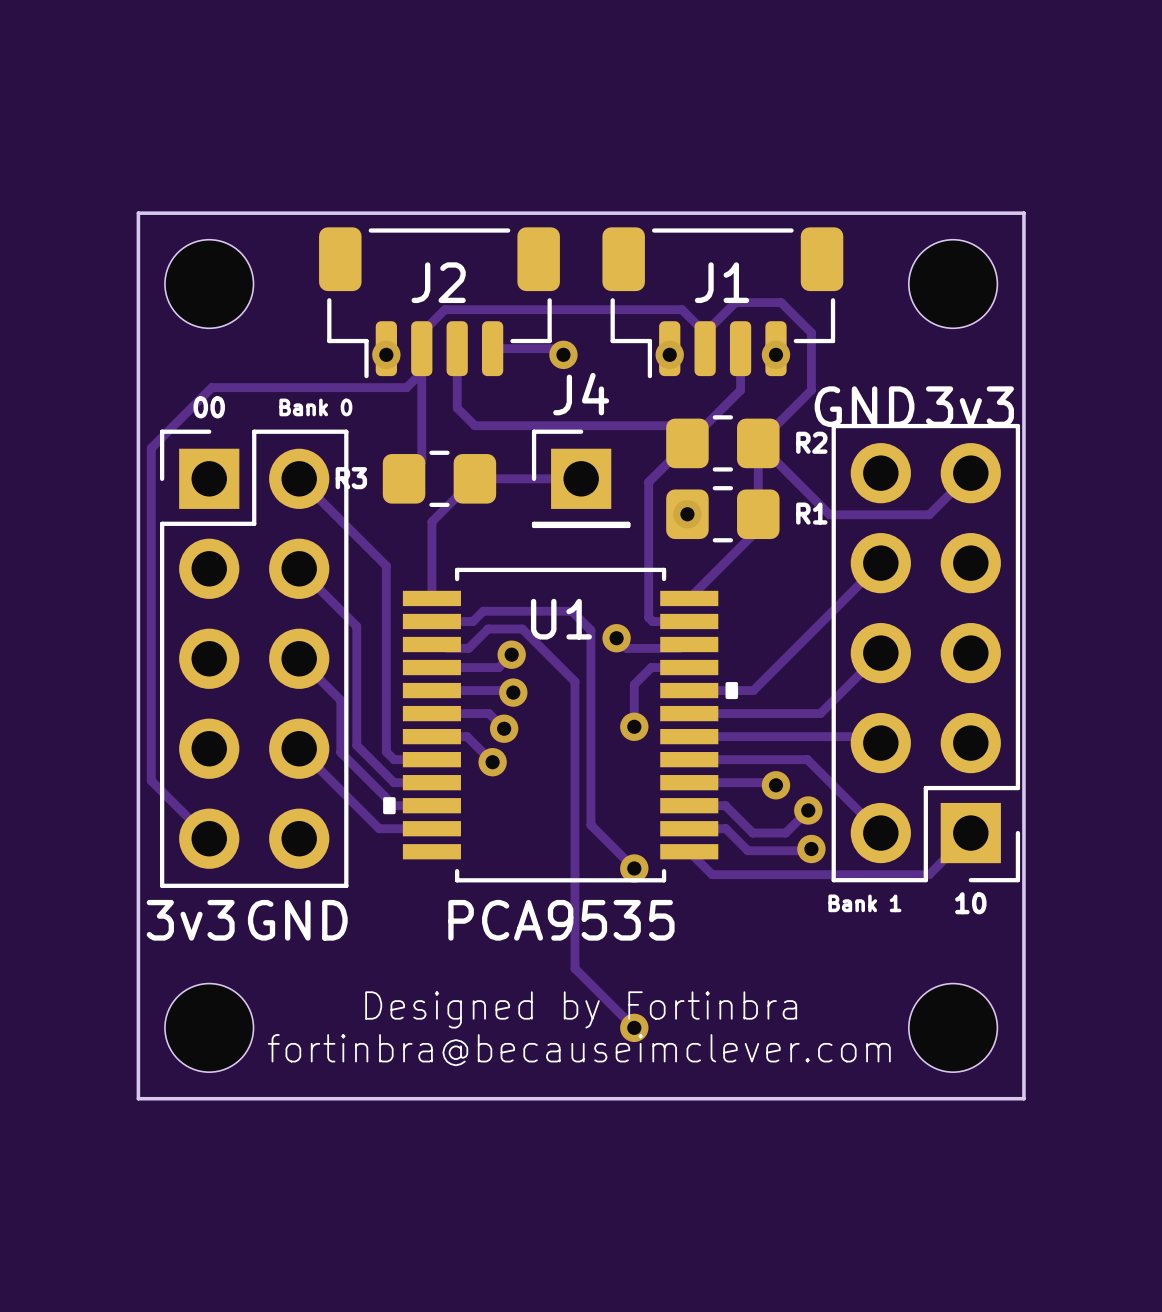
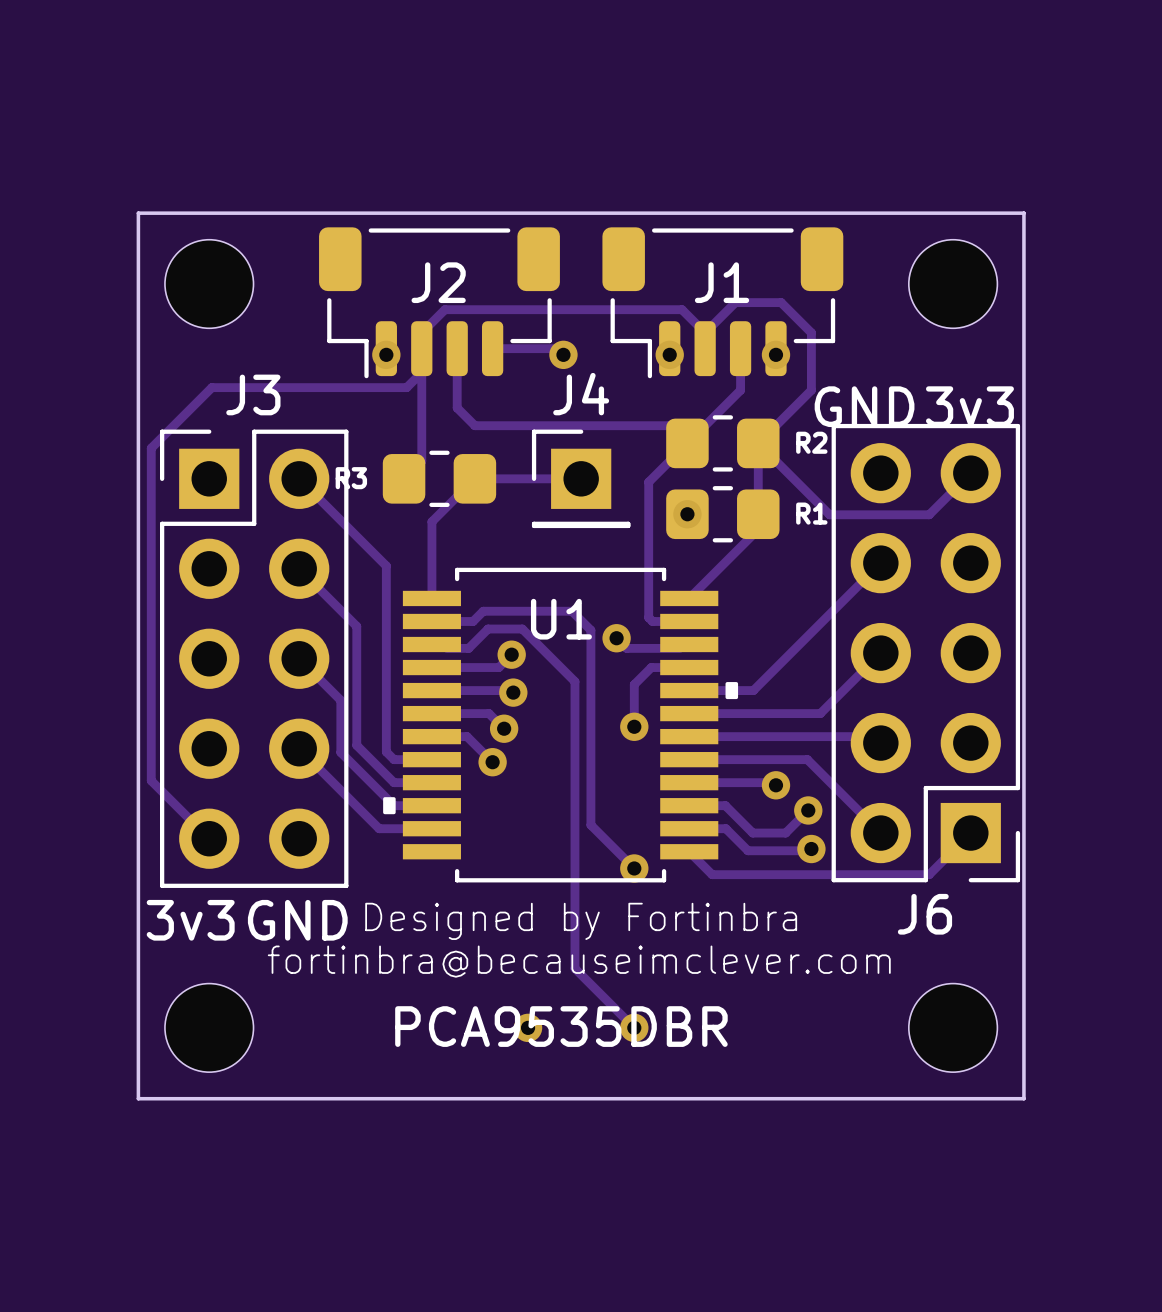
J3 name: none -> J3 (253, 394)
text: 00 (209, 407) -> none
text: Bank 0 (315, 407) -> none
text: Bank 1 (864, 903) -> none
text: 10 (970, 903) -> none
J6 name: none -> J6 (924, 914)
U1 value: PCA9535 (561, 920) -> PCA9535DBR (561, 1026)
text position: Designed by Fortinbra (581, 1009) -> Designed by Fortinbra (581, 921)
via: none -> (528, 1027)
text position: fortinbra@becauseimclever.com (579, 1050) -> fortinbra@becauseimclever.com (579, 961)

